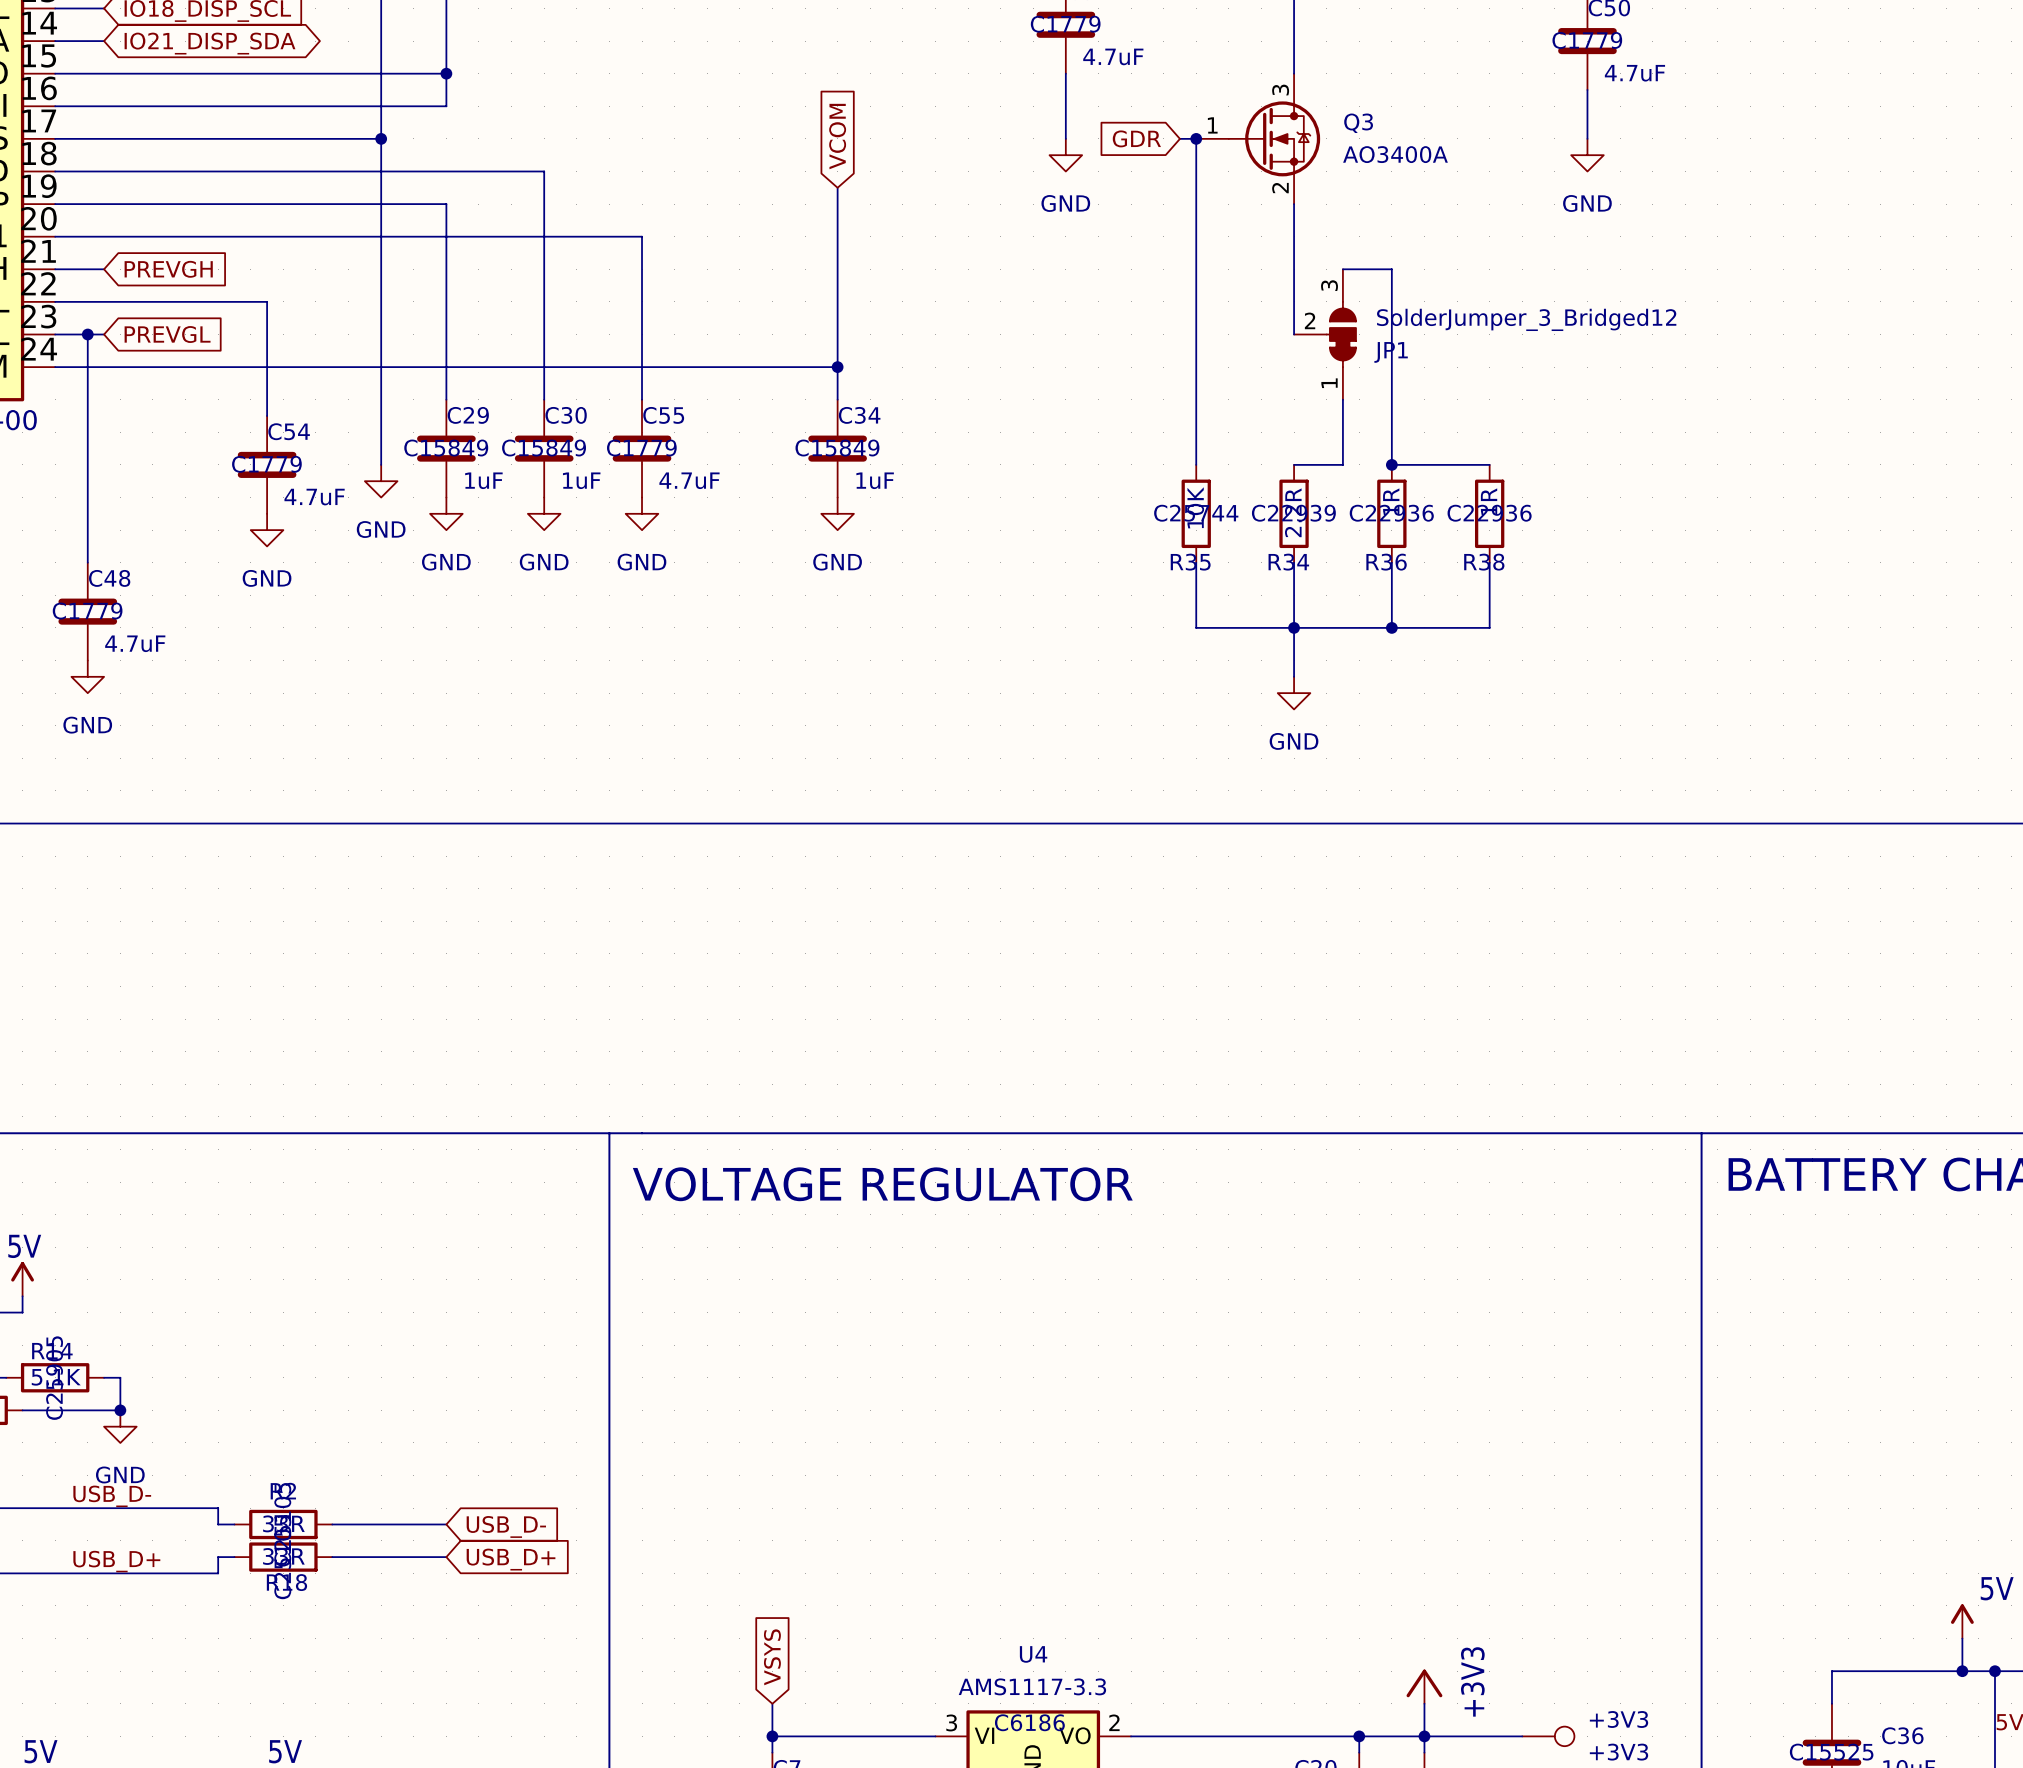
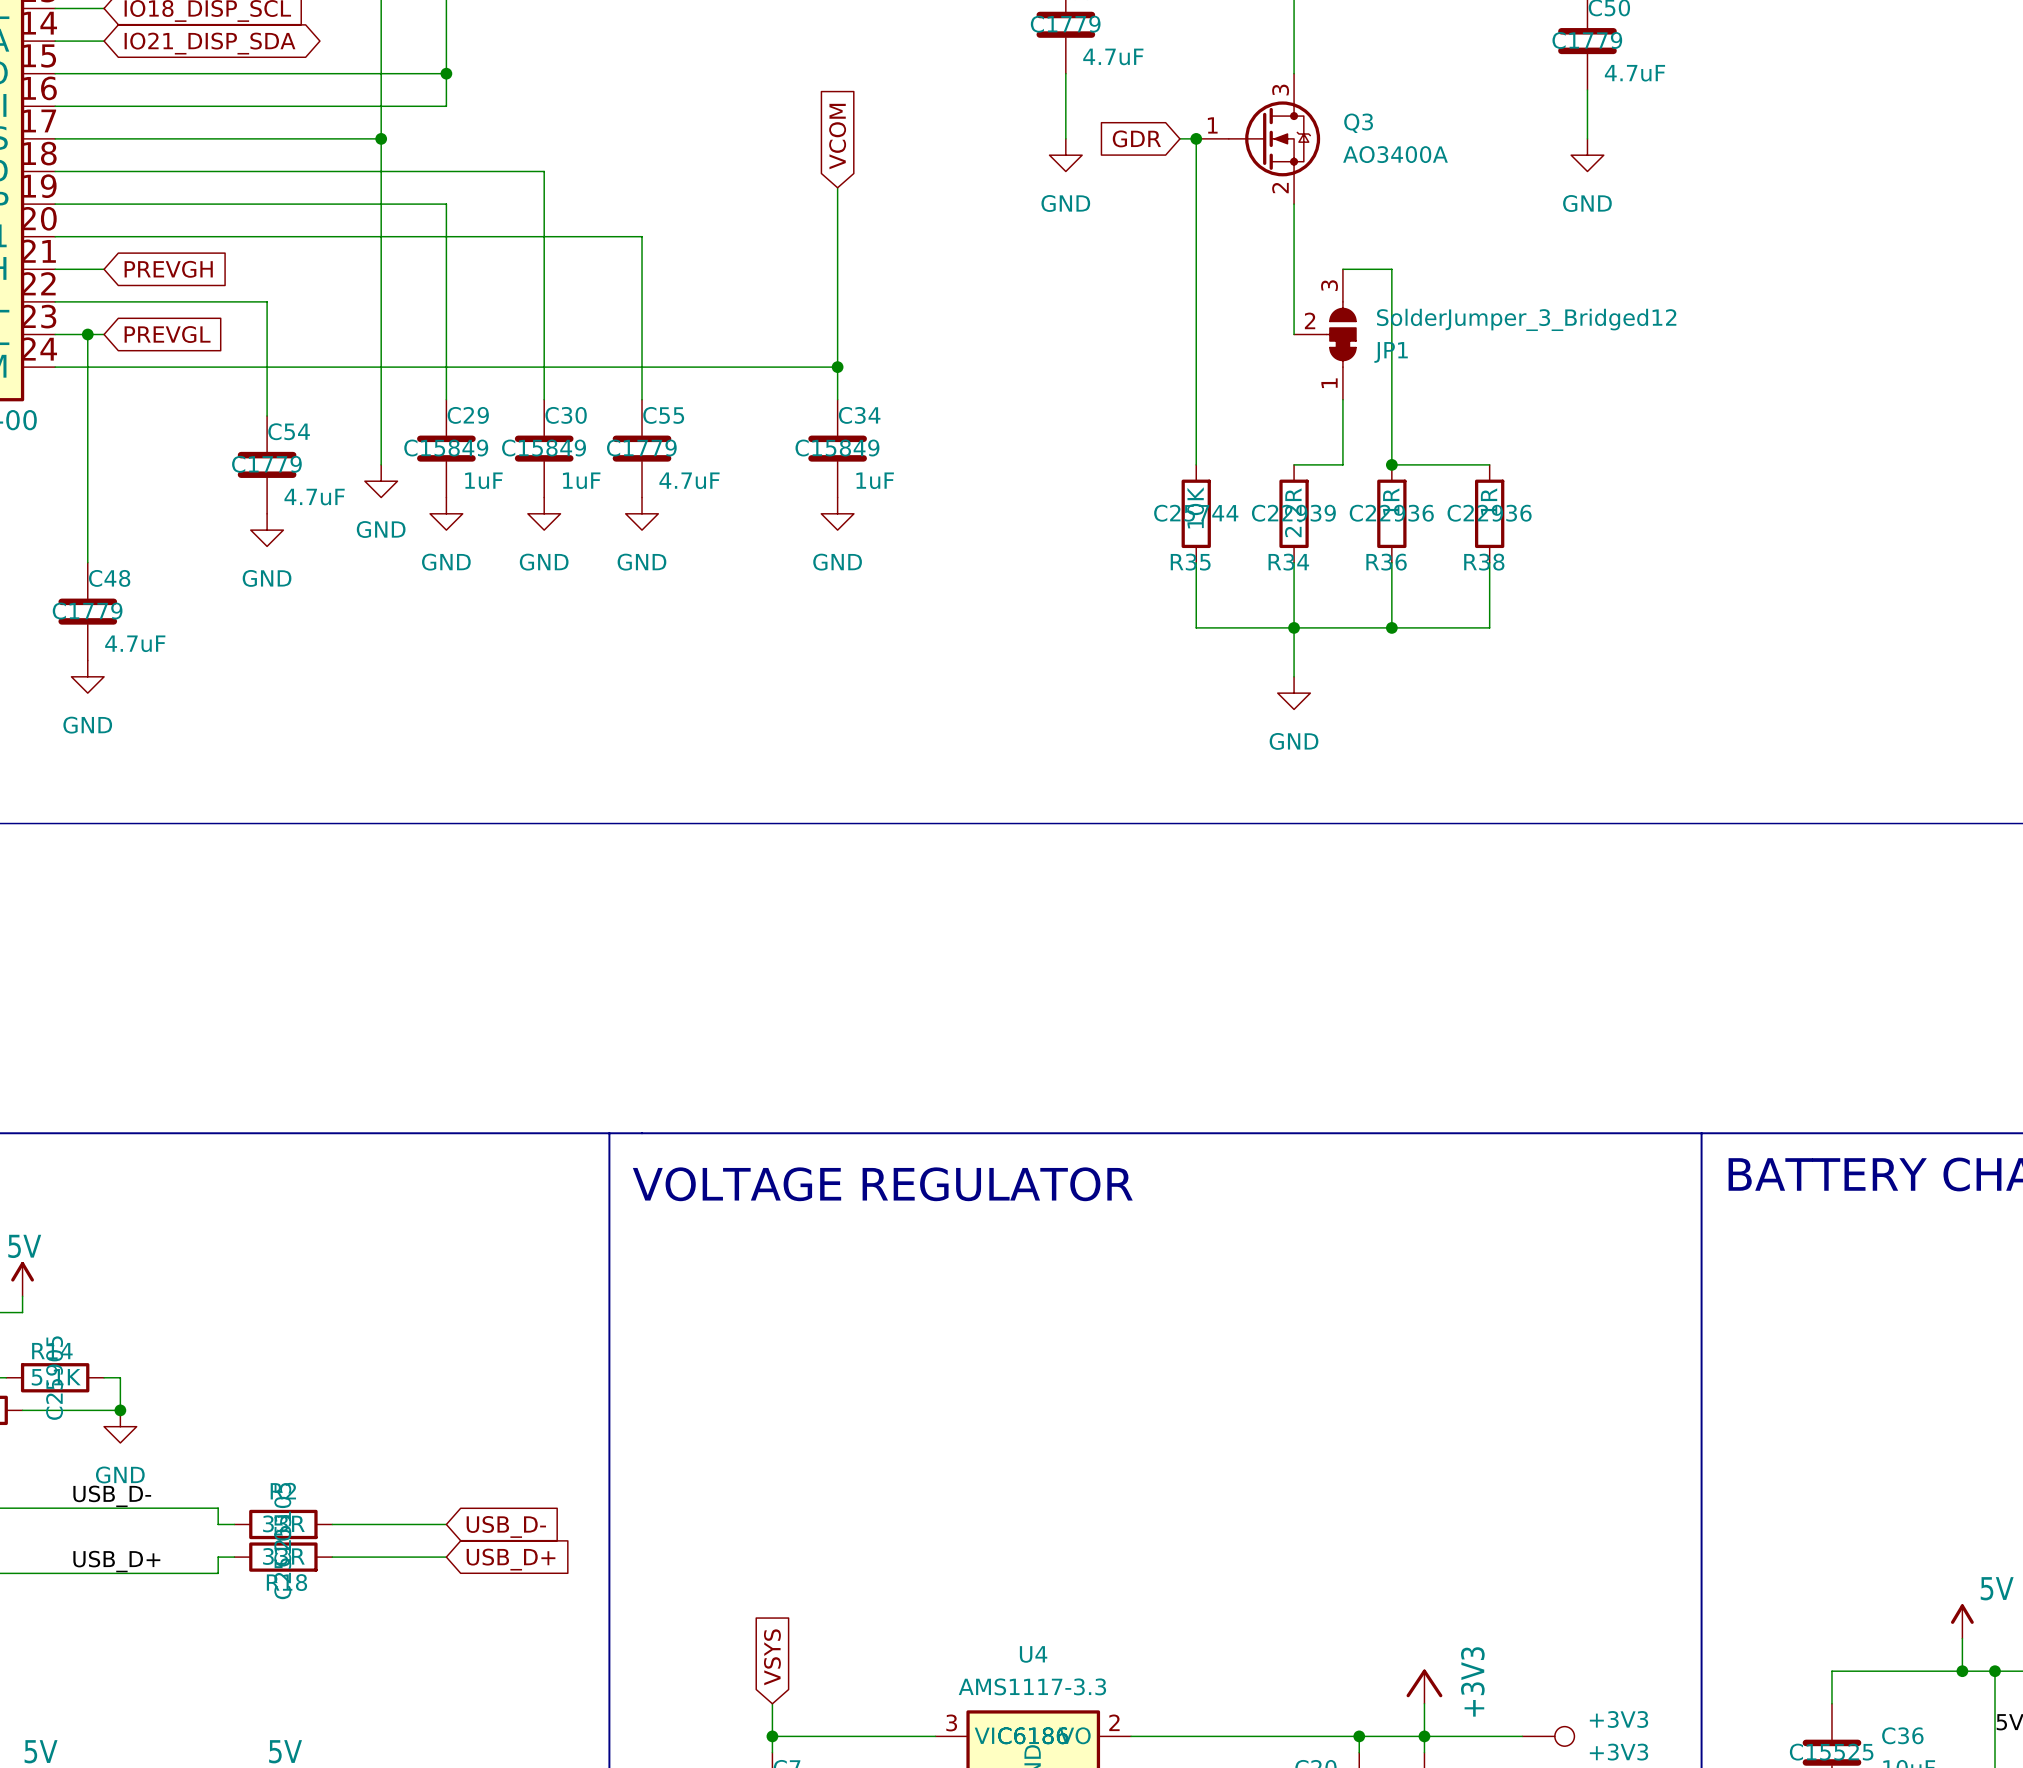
U4 text position: C6186 (1029, 1722) -> C6186 (1033, 1735)
U4 text: none -> C6186 (1033, 1735)

